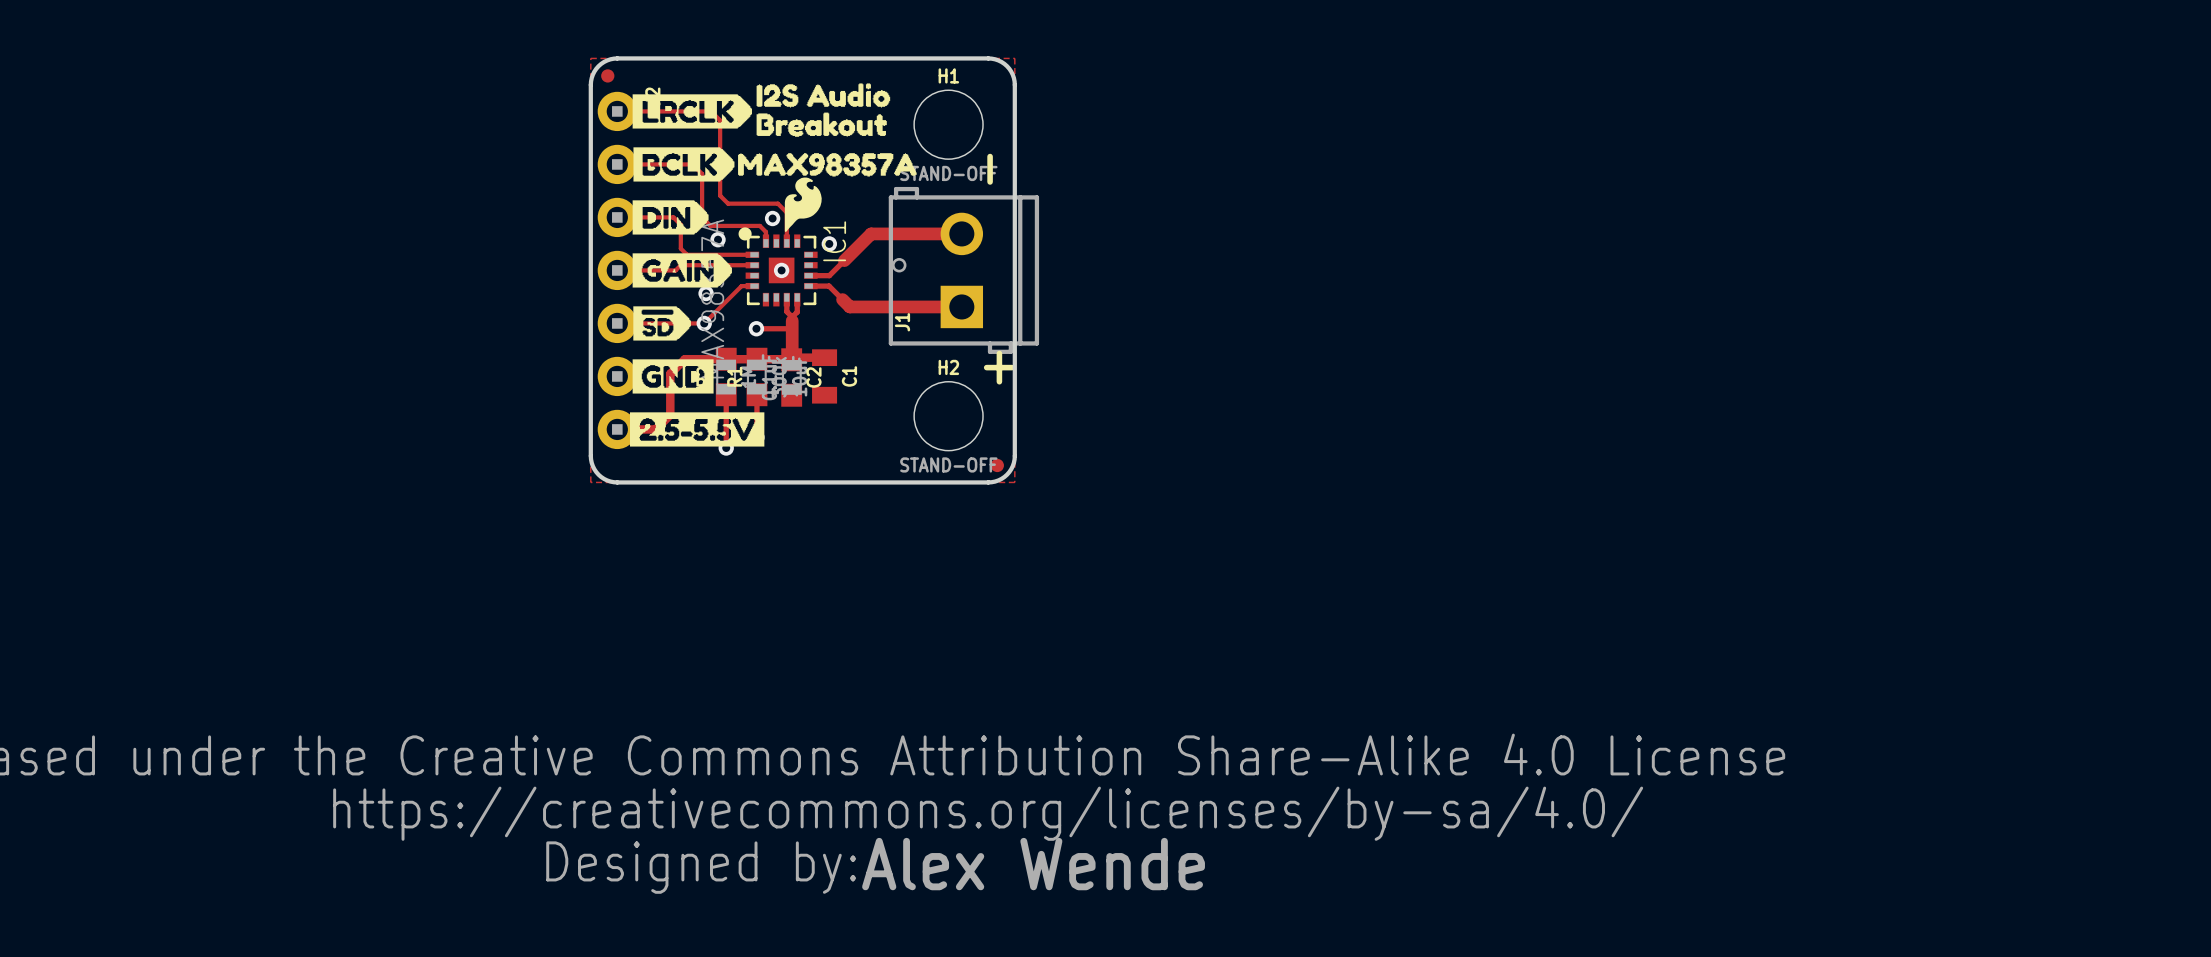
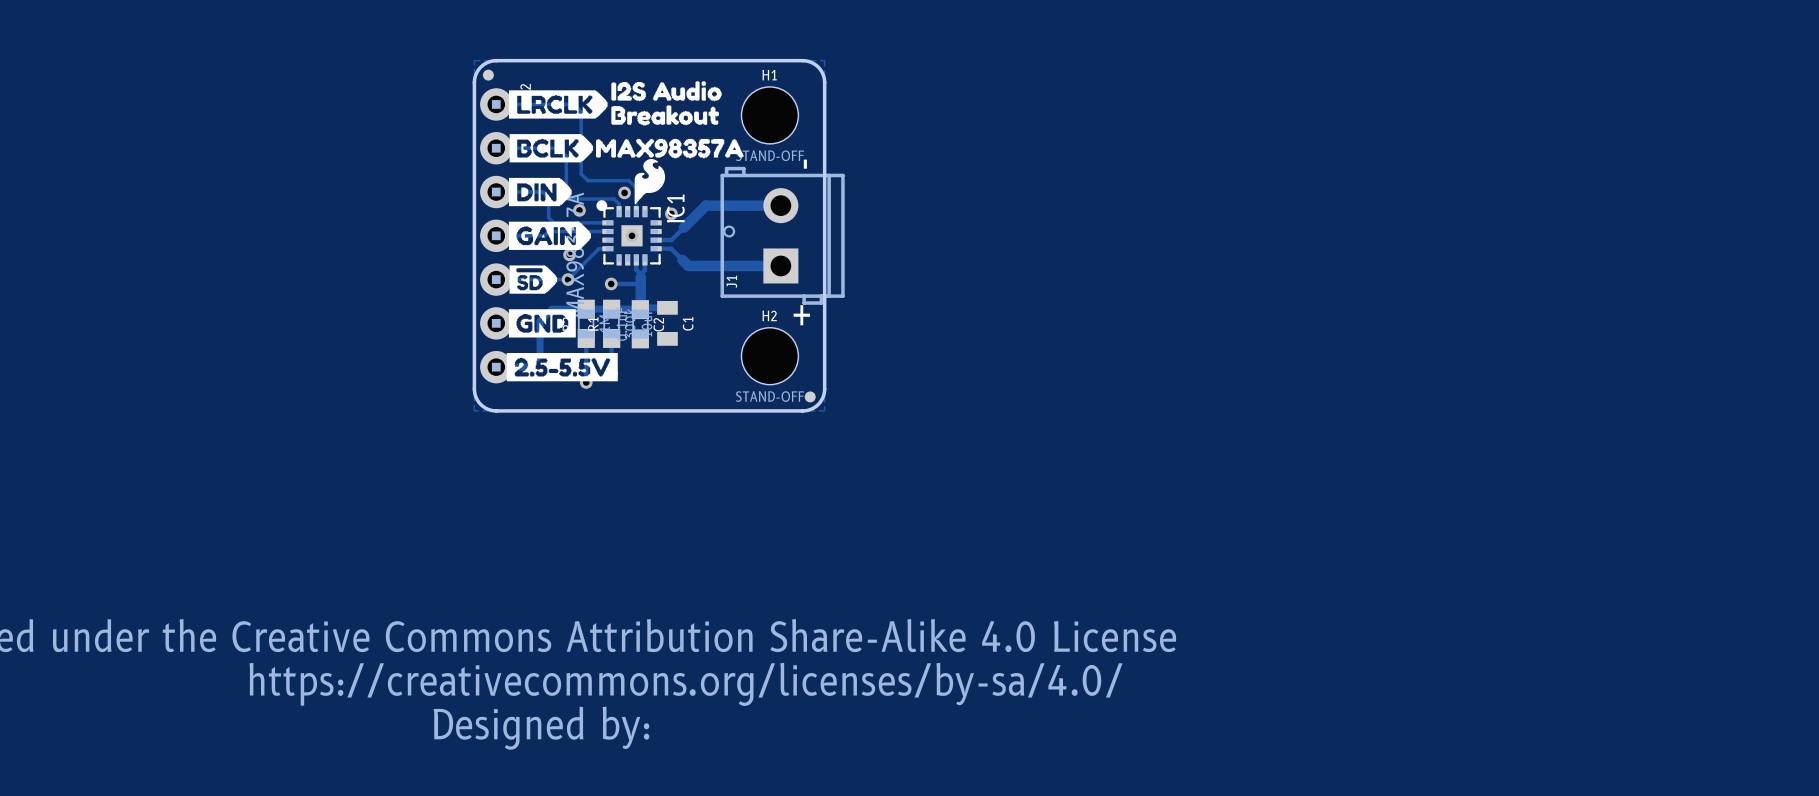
text: Alex Wende (1033, 864) -> none

